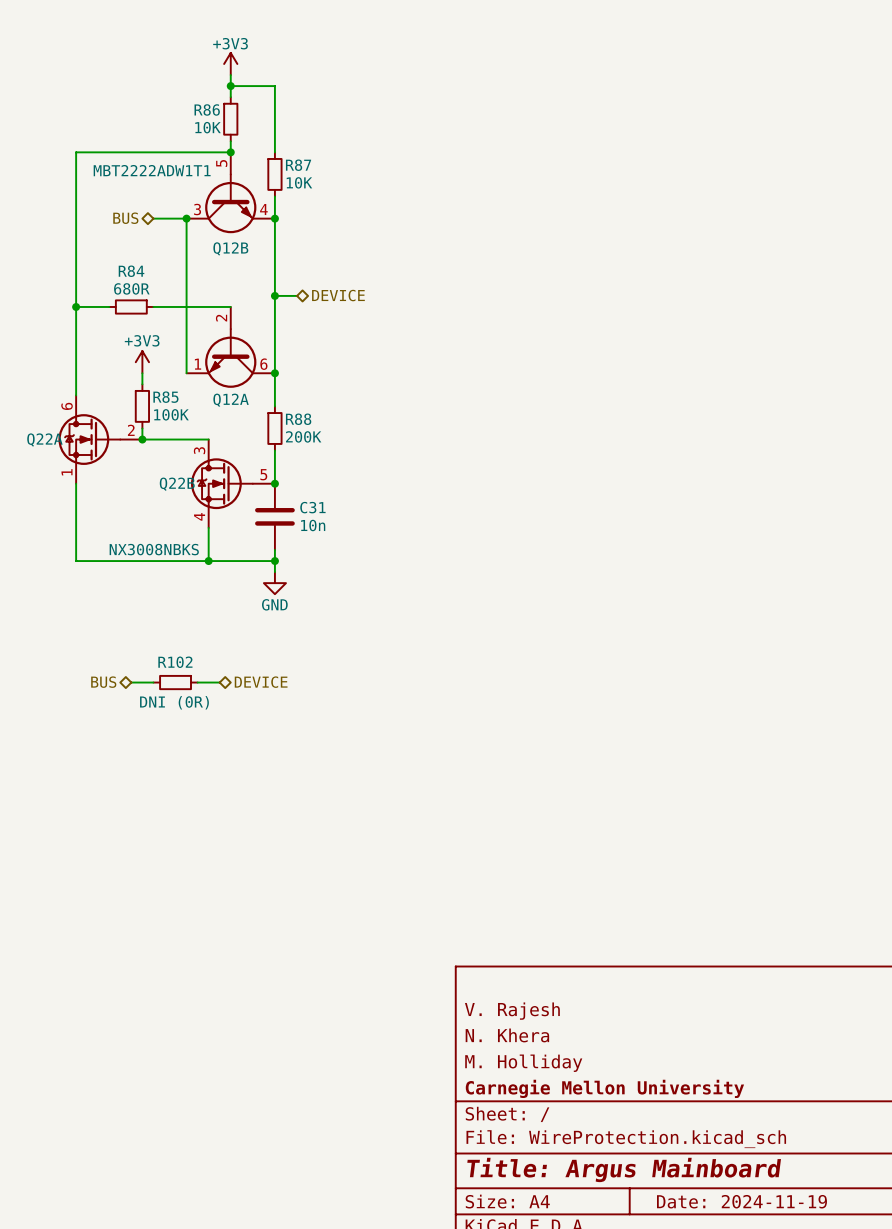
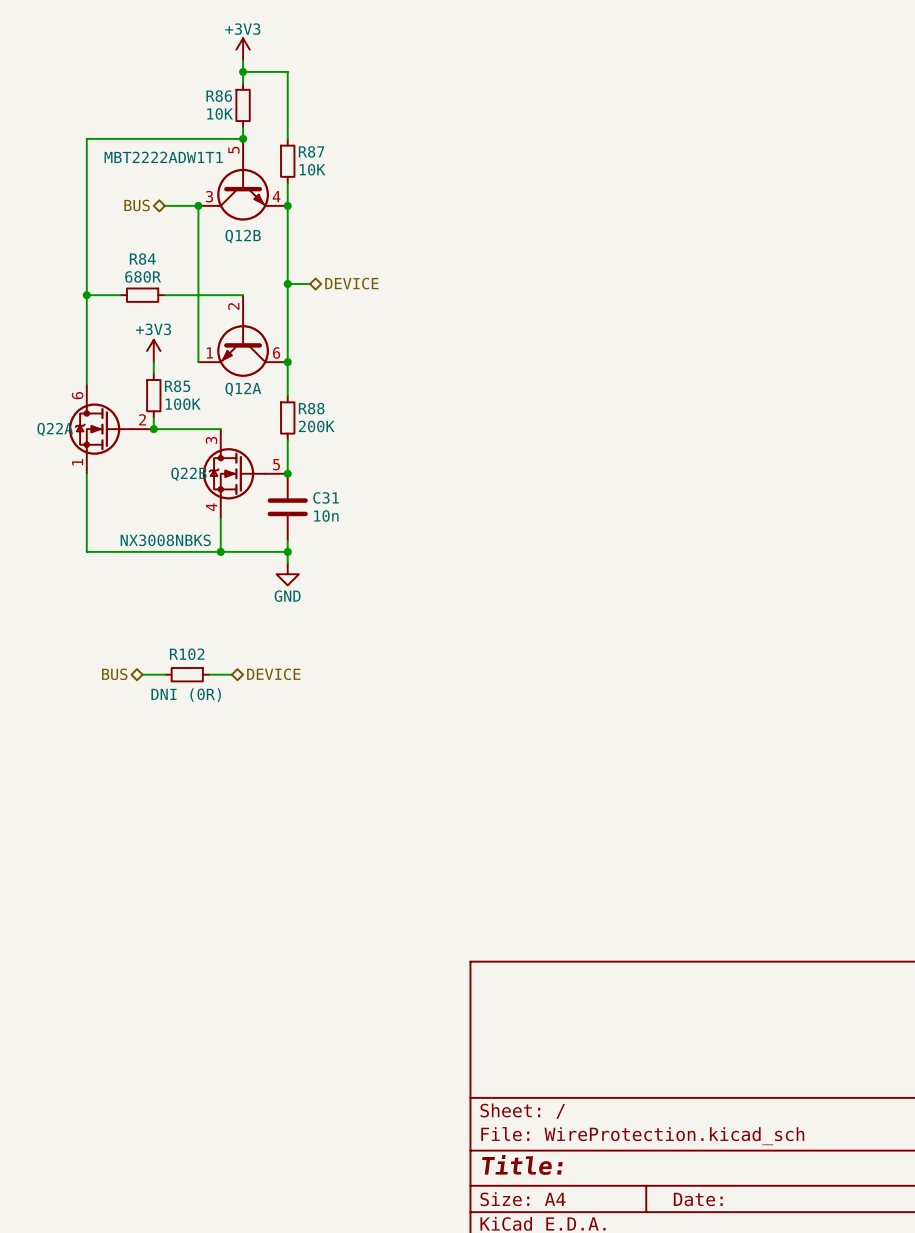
title block: V. Rajesh (512, 1011) -> none
title block: N. Khera (507, 1035) -> none
title block: M. Holliday (523, 1063) -> none
title block: Carnegie Mellon University (604, 1088) -> none
title block: Title: Argus Mainboard (624, 1169) -> Title: (522, 1164)
title block: Date: 2024-11-19 (741, 1201) -> Date: (698, 1199)

